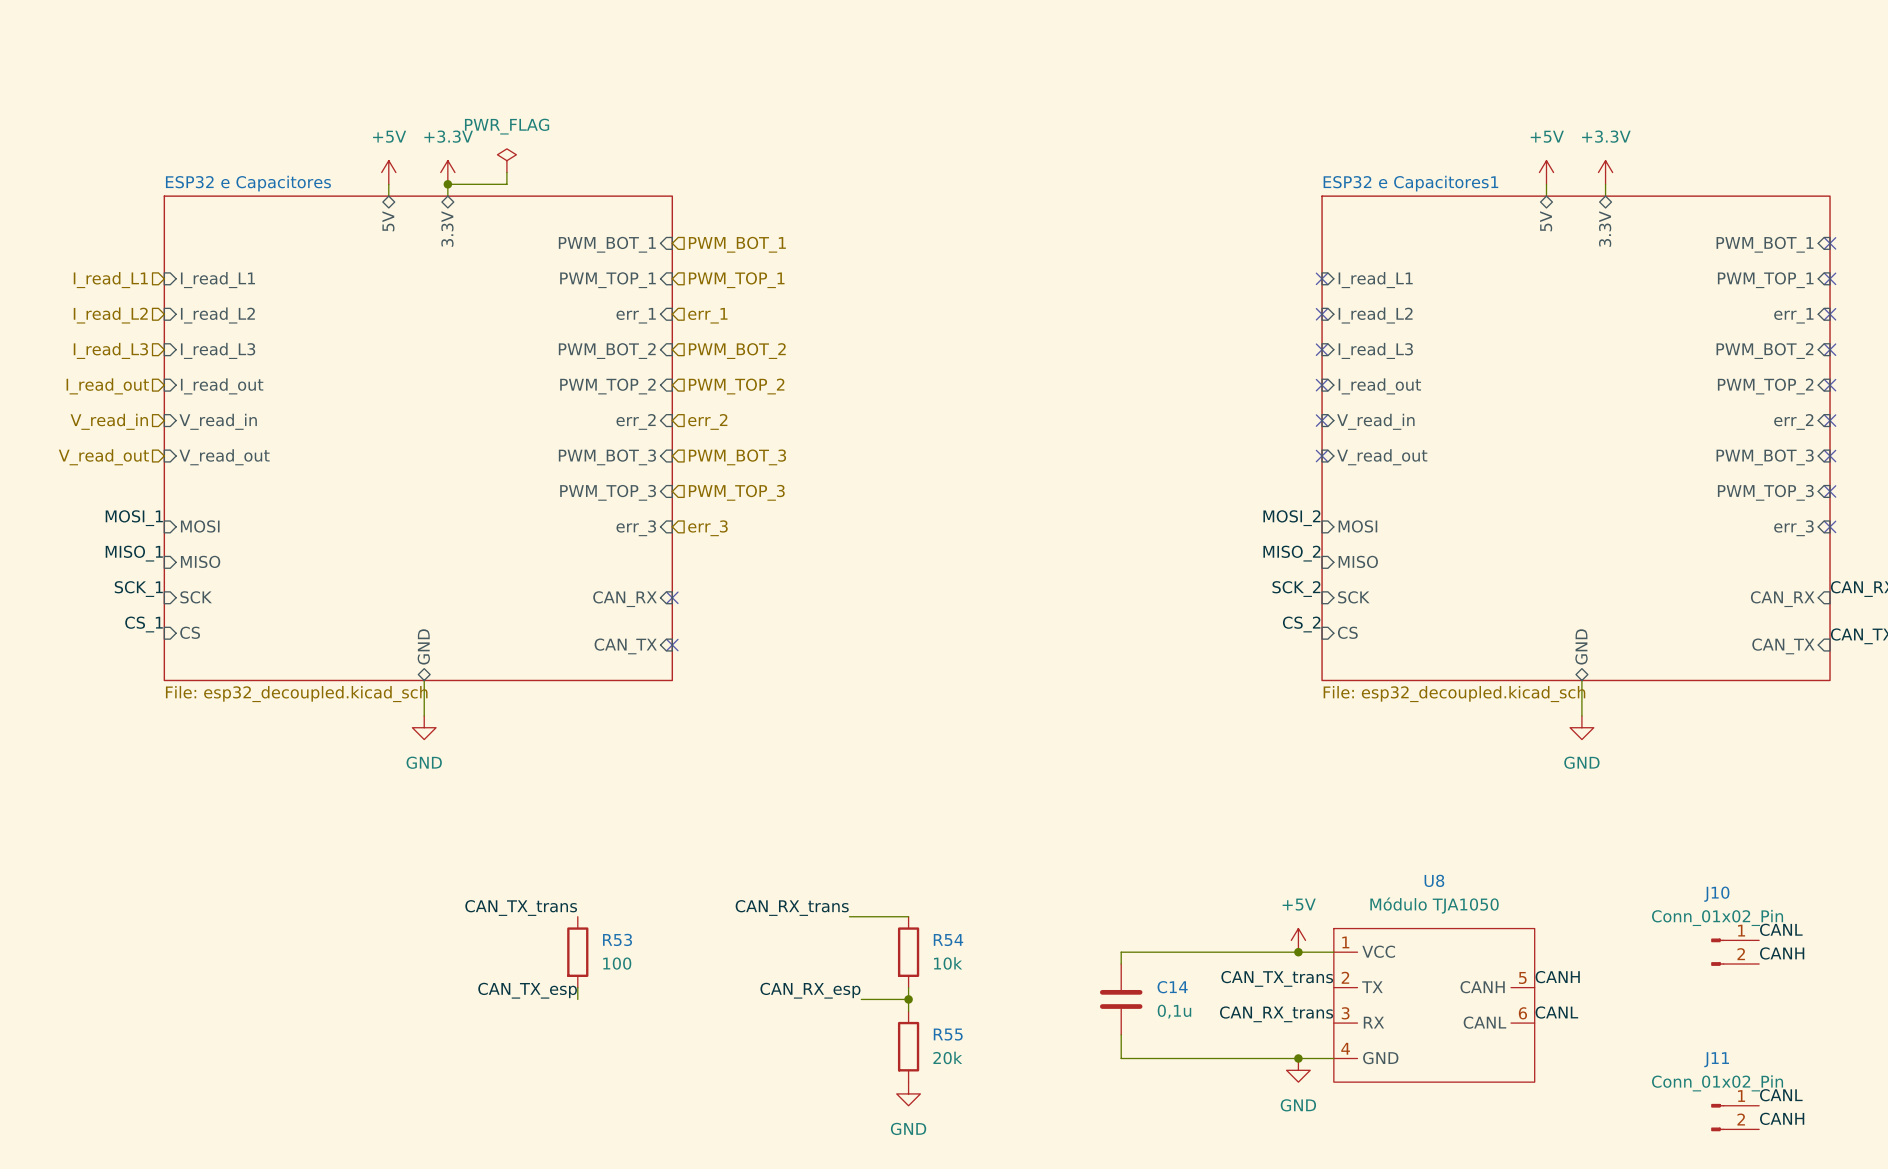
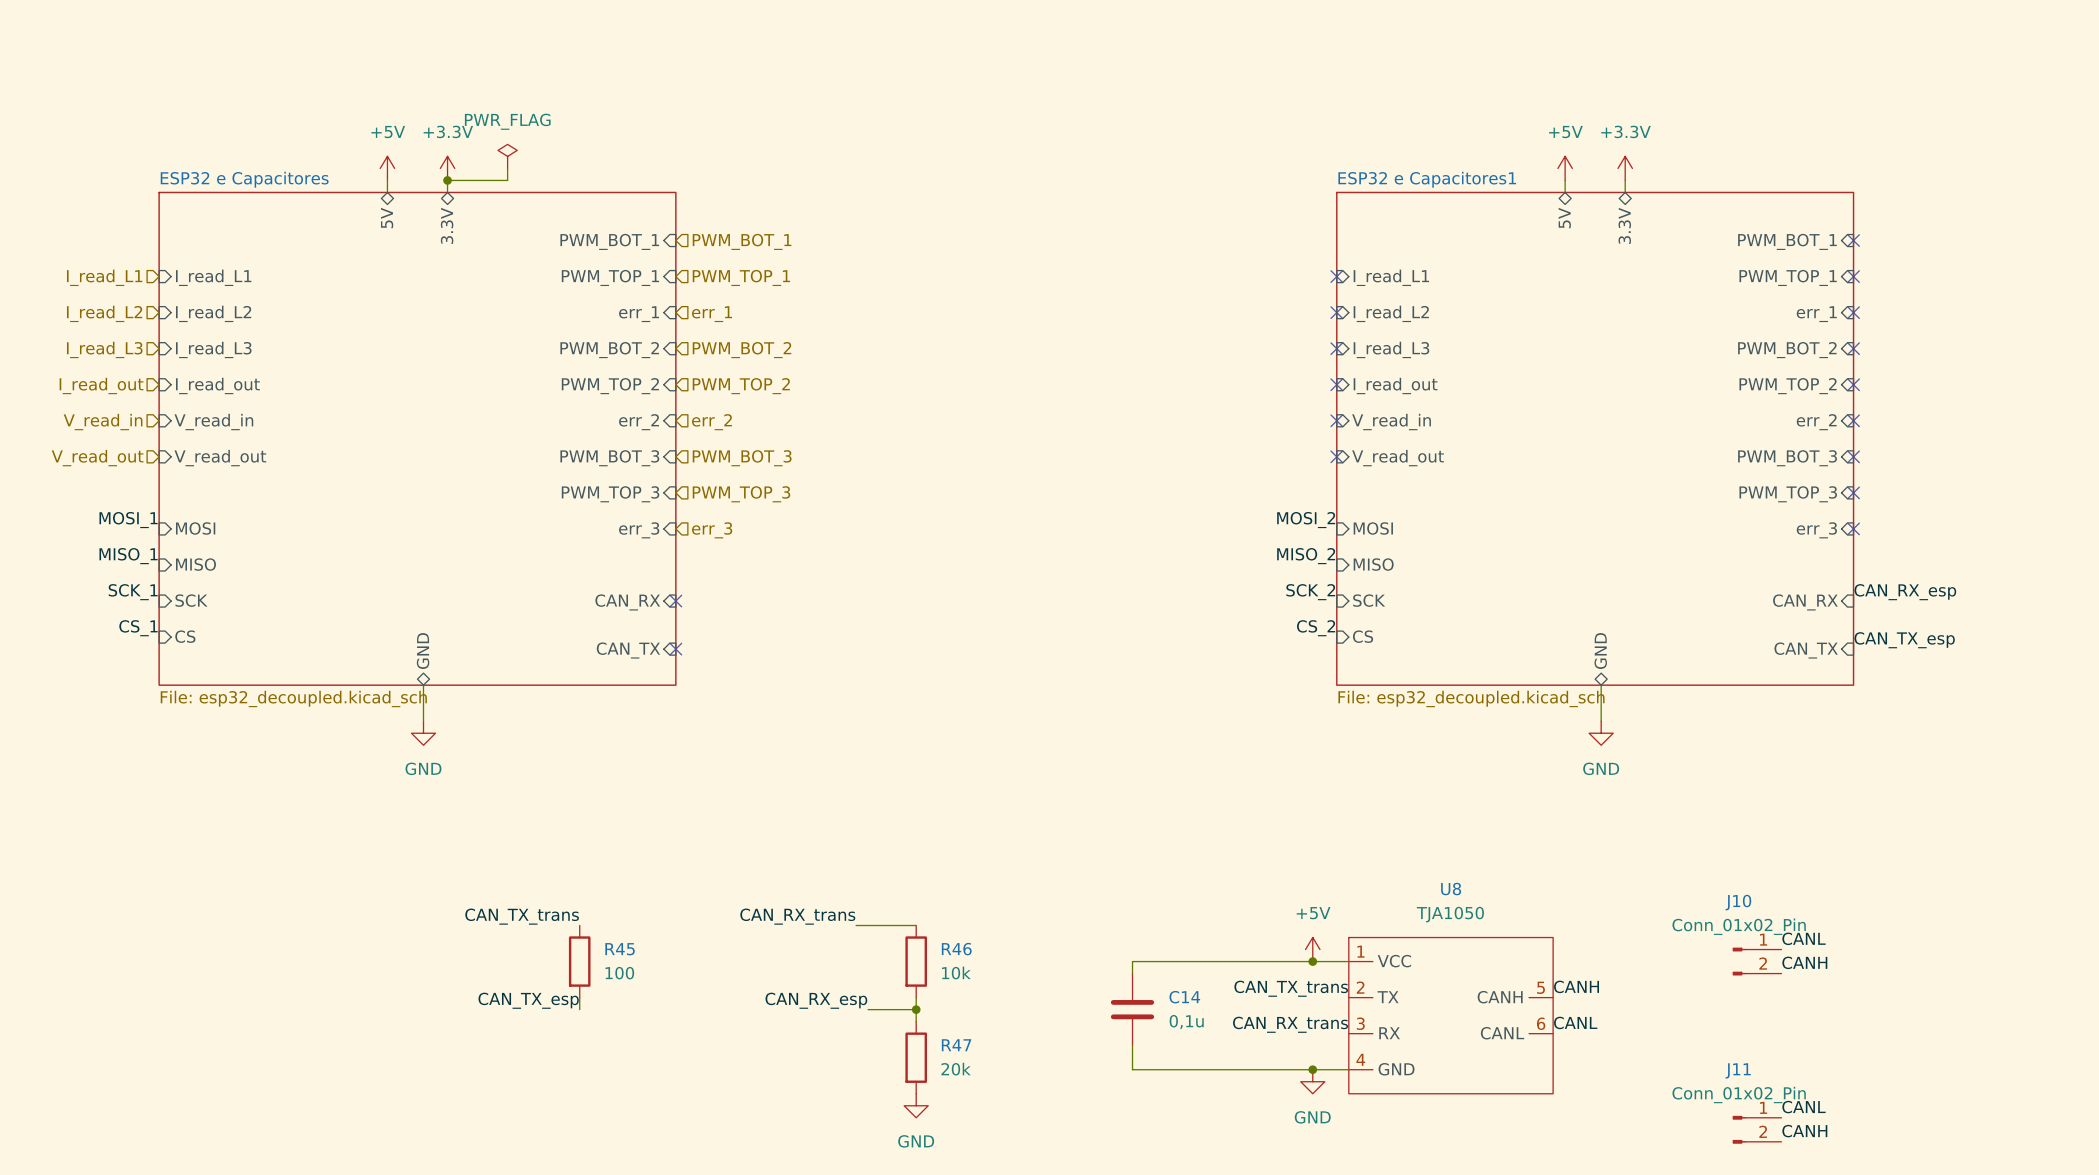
U8 value: Módulo TJA1050 (1434, 905) -> TJA1050 (1450, 914)
R53 name: R53 (617, 939) -> R45 (620, 949)
R54 name: R54 (948, 940) -> R46 (956, 949)
R55 name: R55 (948, 1034) -> R47 (956, 1045)

